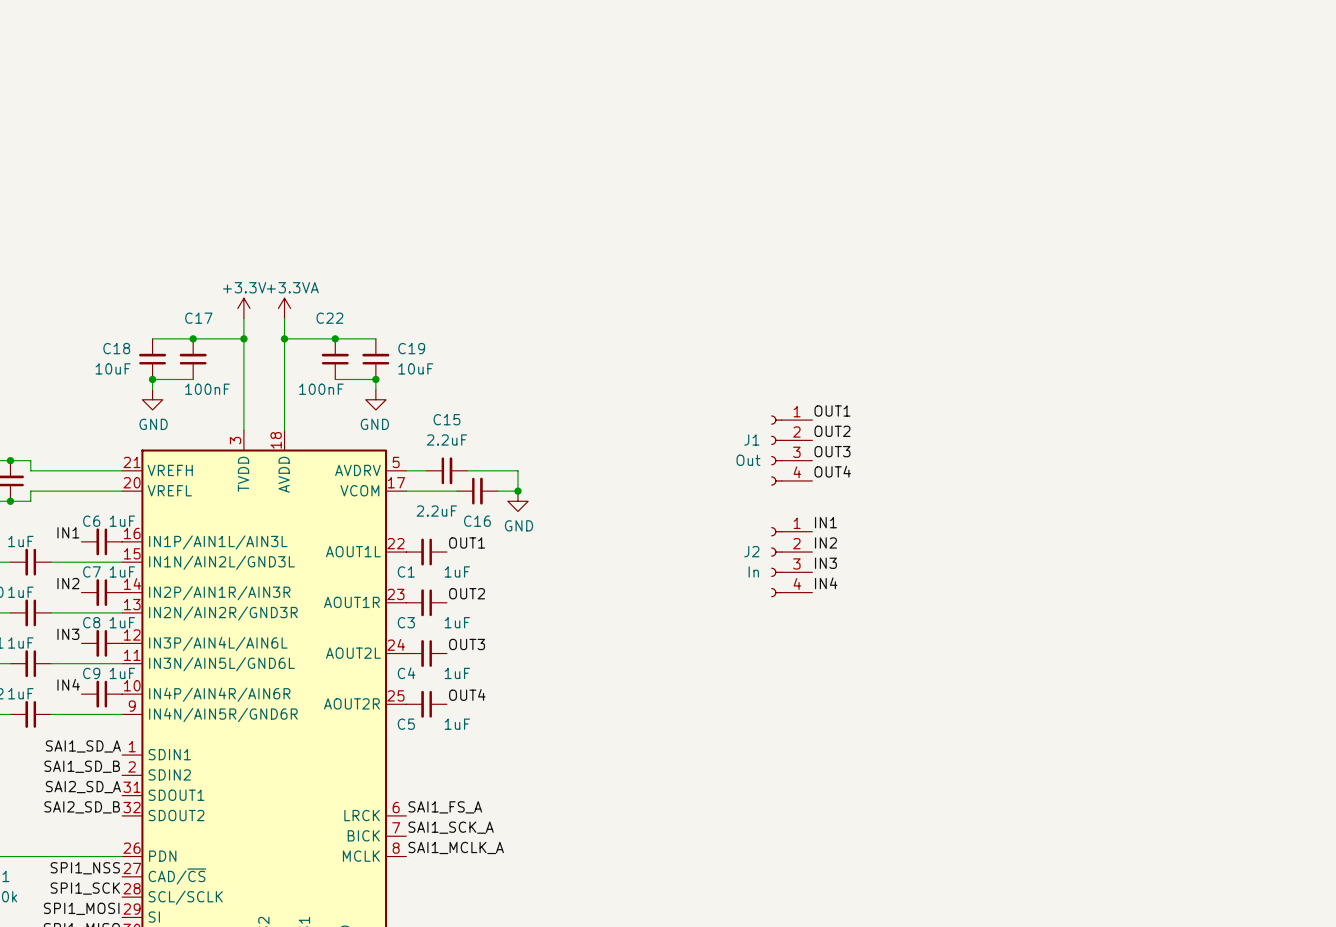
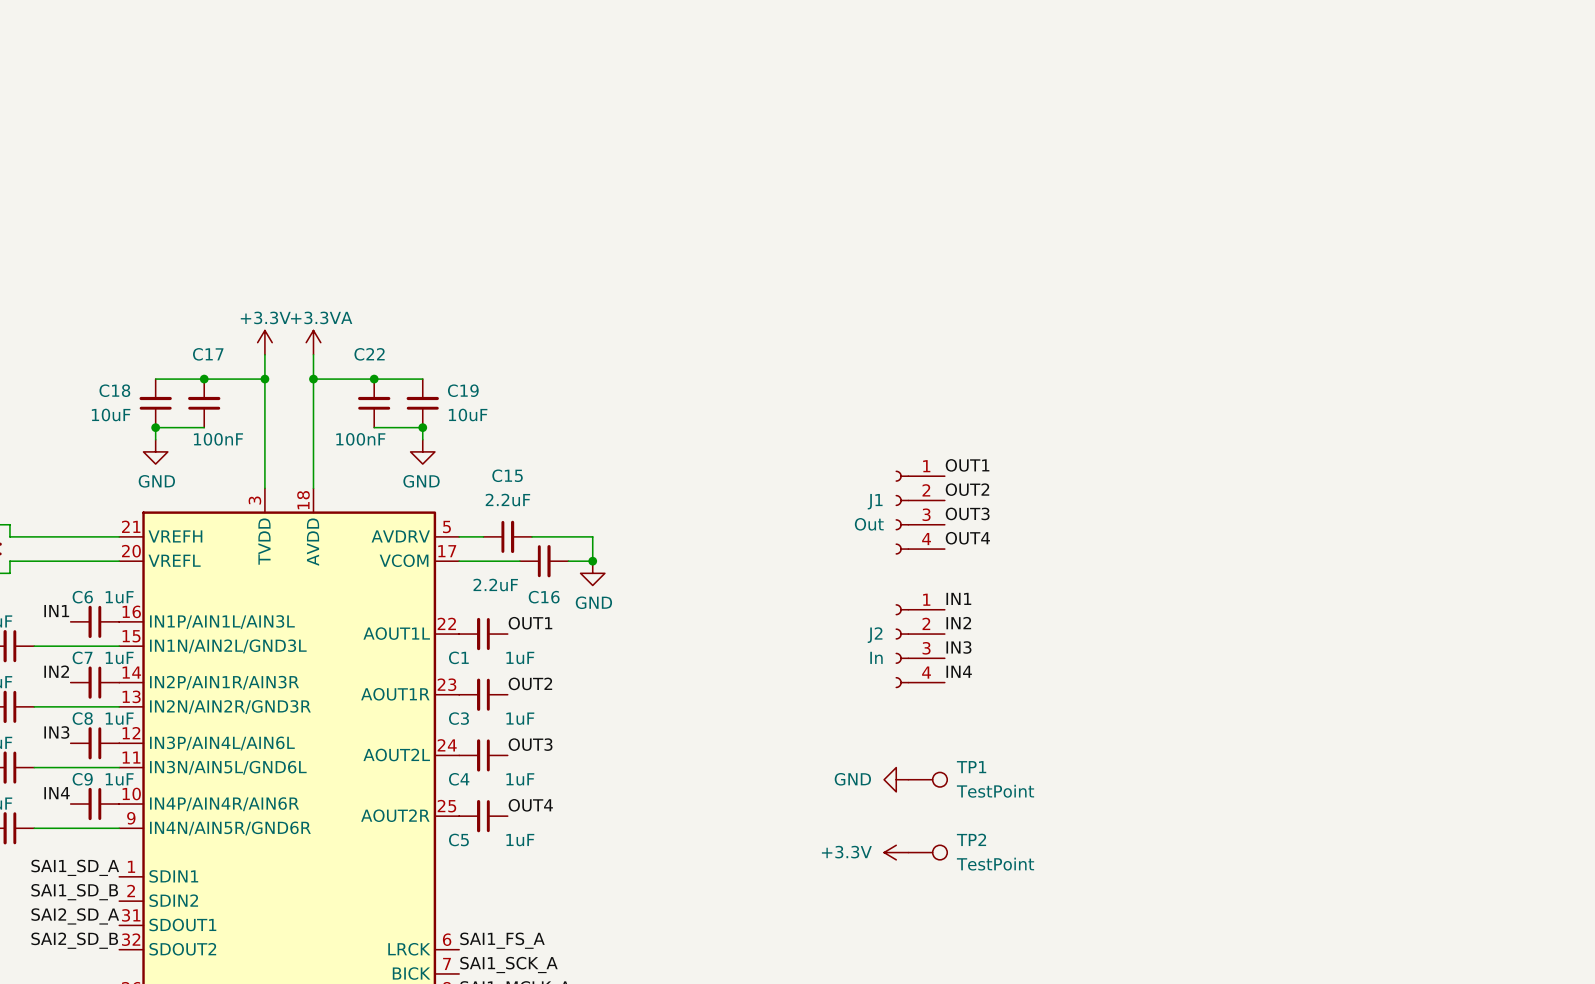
power symbol: none -> GND (896, 779)
TP1: none -> TestPoint (927, 779)
power symbol: none -> +3.3V (896, 852)
TP2: none -> TestPoint (927, 852)

